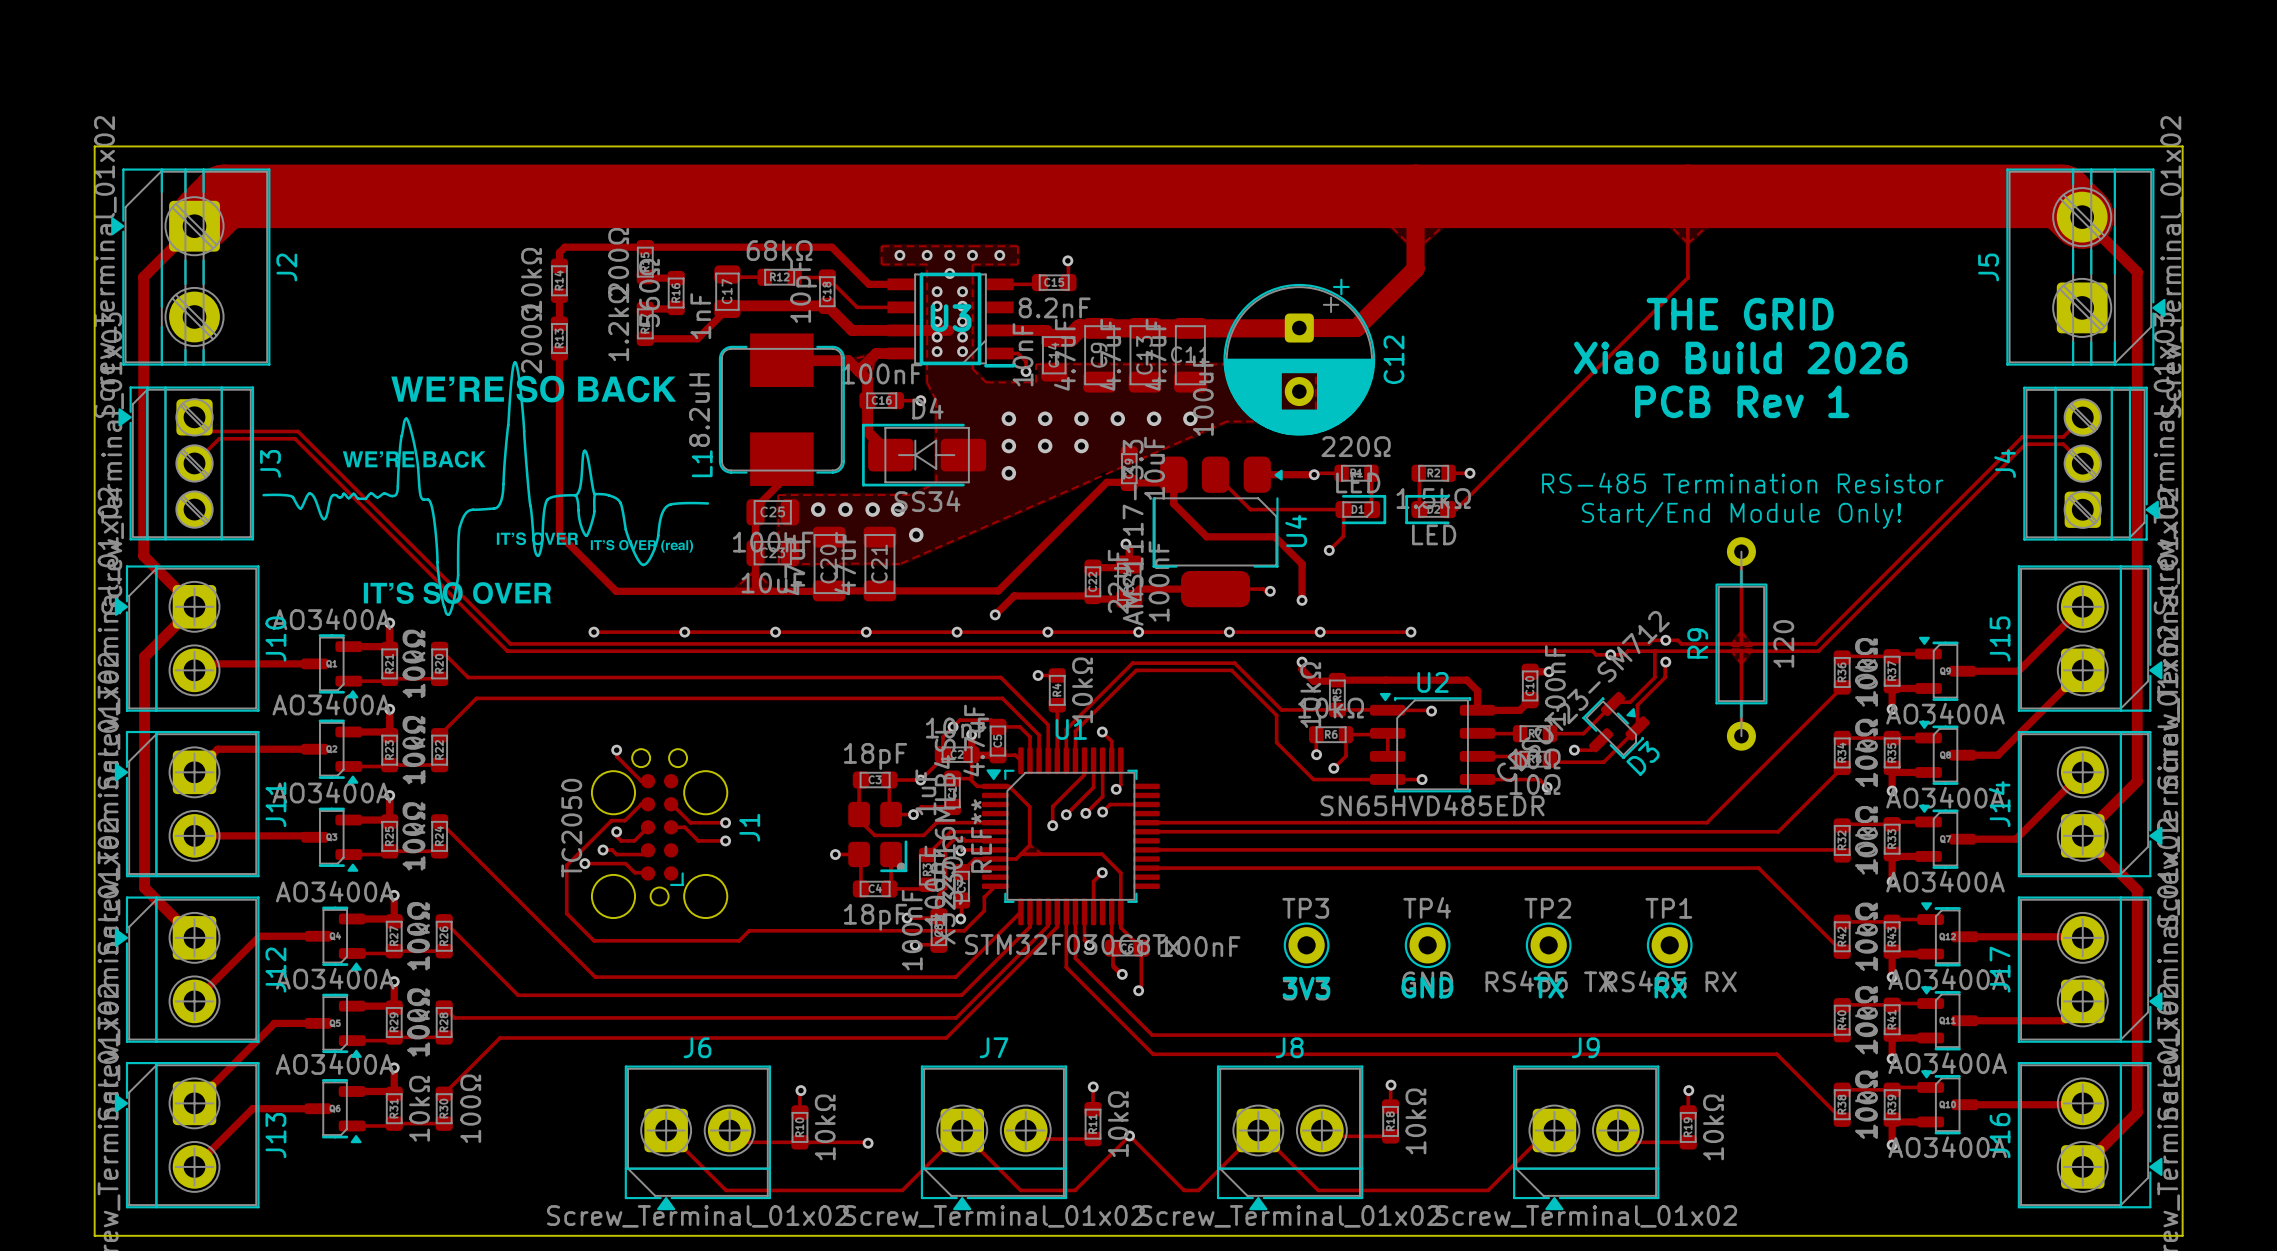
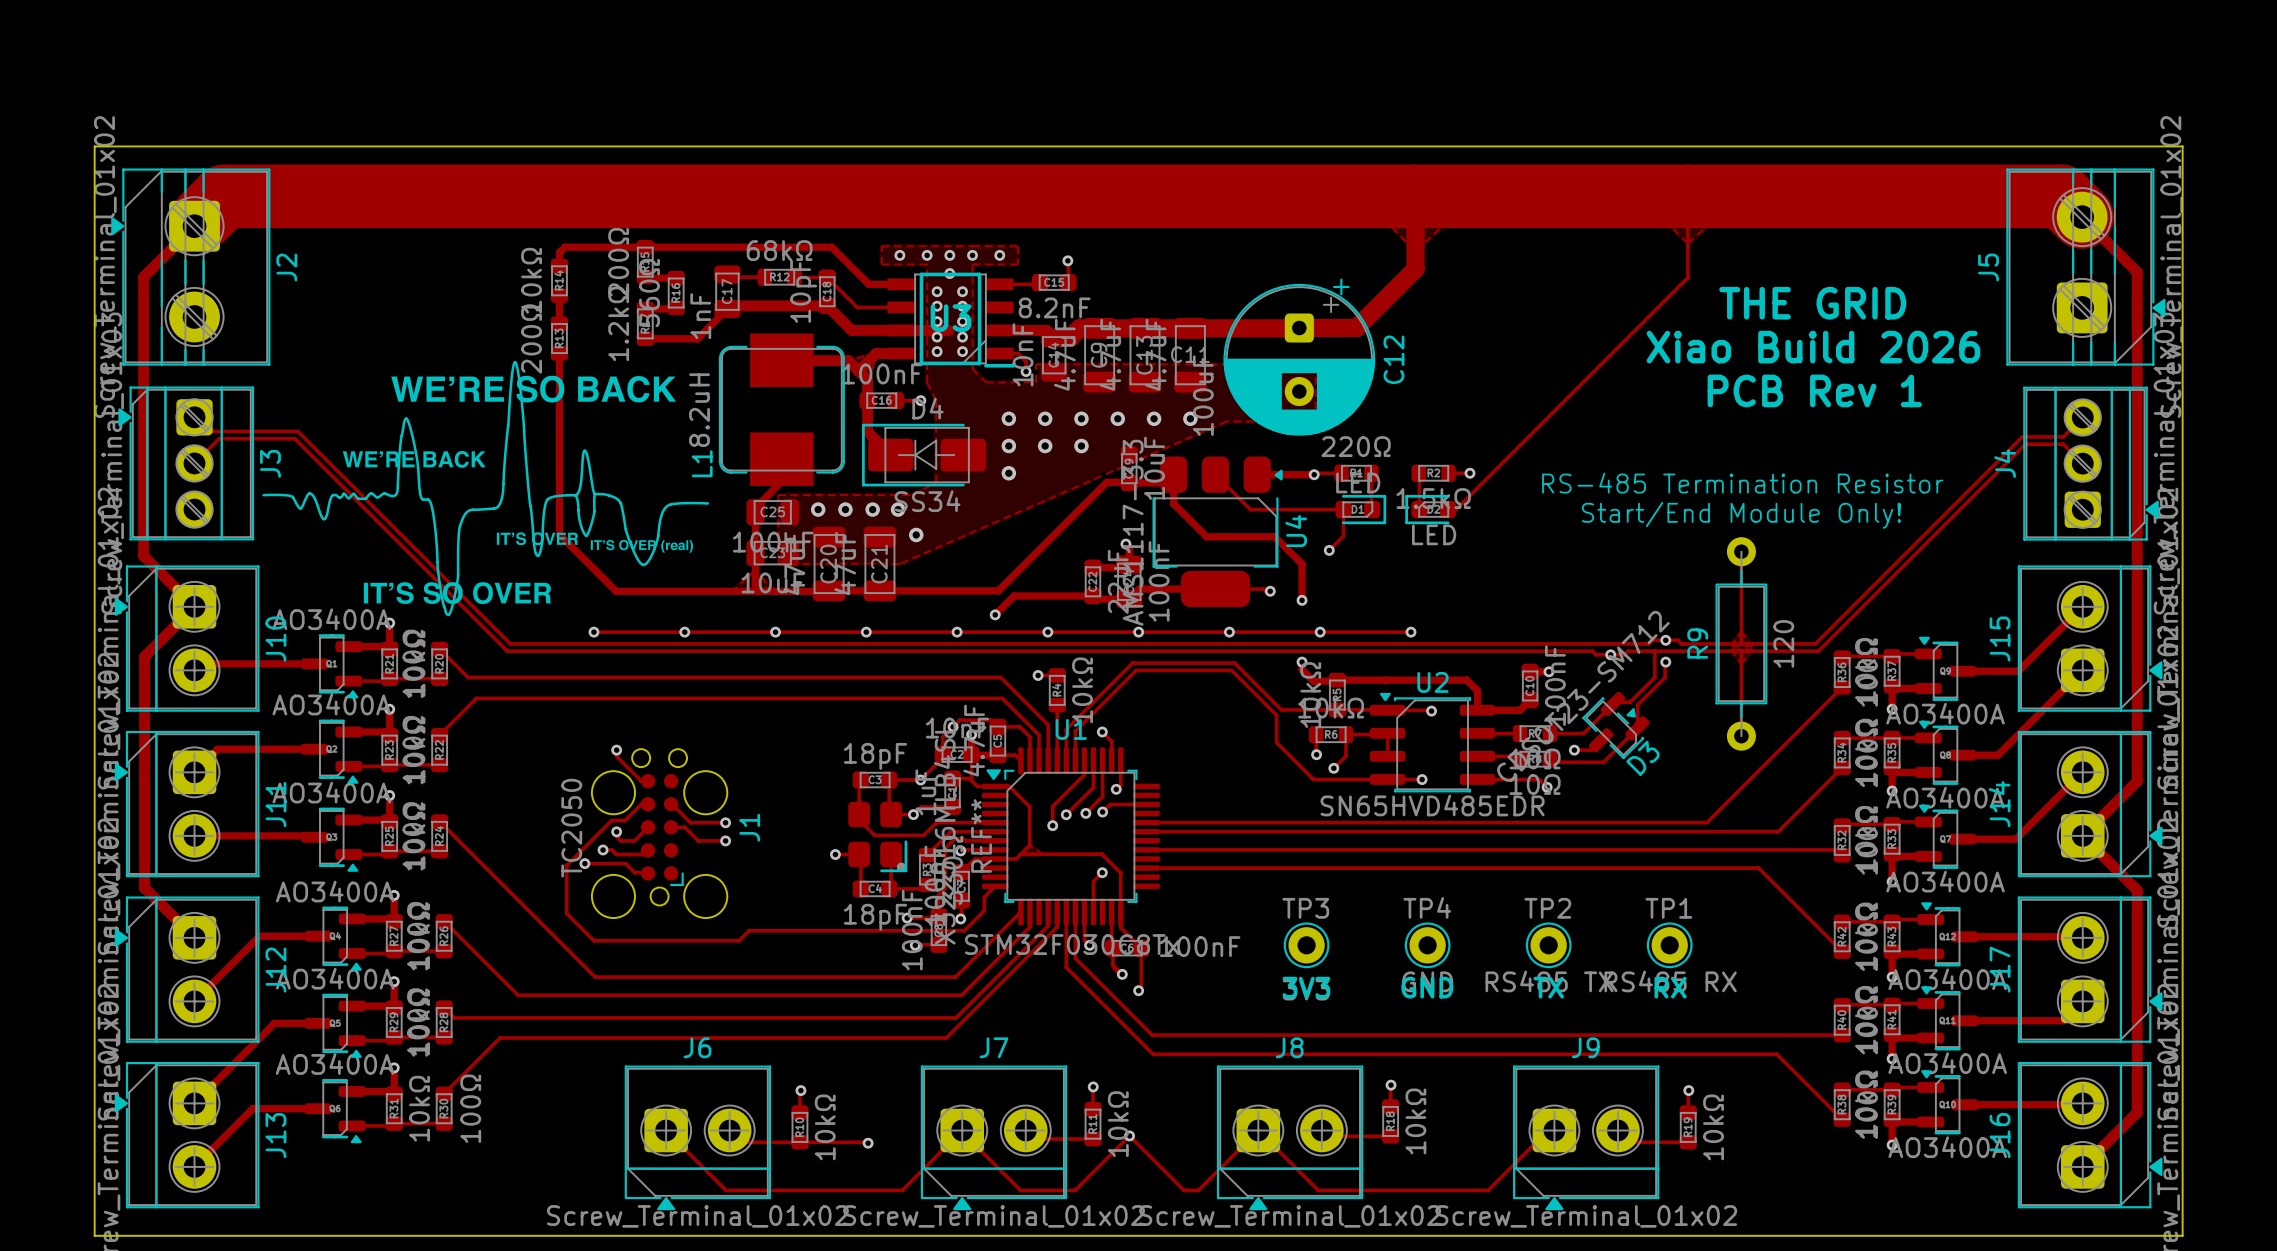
text position: THE GRID (1740, 314) -> THE GRID (1812, 303)
text position: Xiao Build 2026 (1740, 357) -> Xiao Build 2026 (1813, 347)
text position: PCB Rev 1 (1742, 401) -> PCB Rev 1 (1814, 390)

